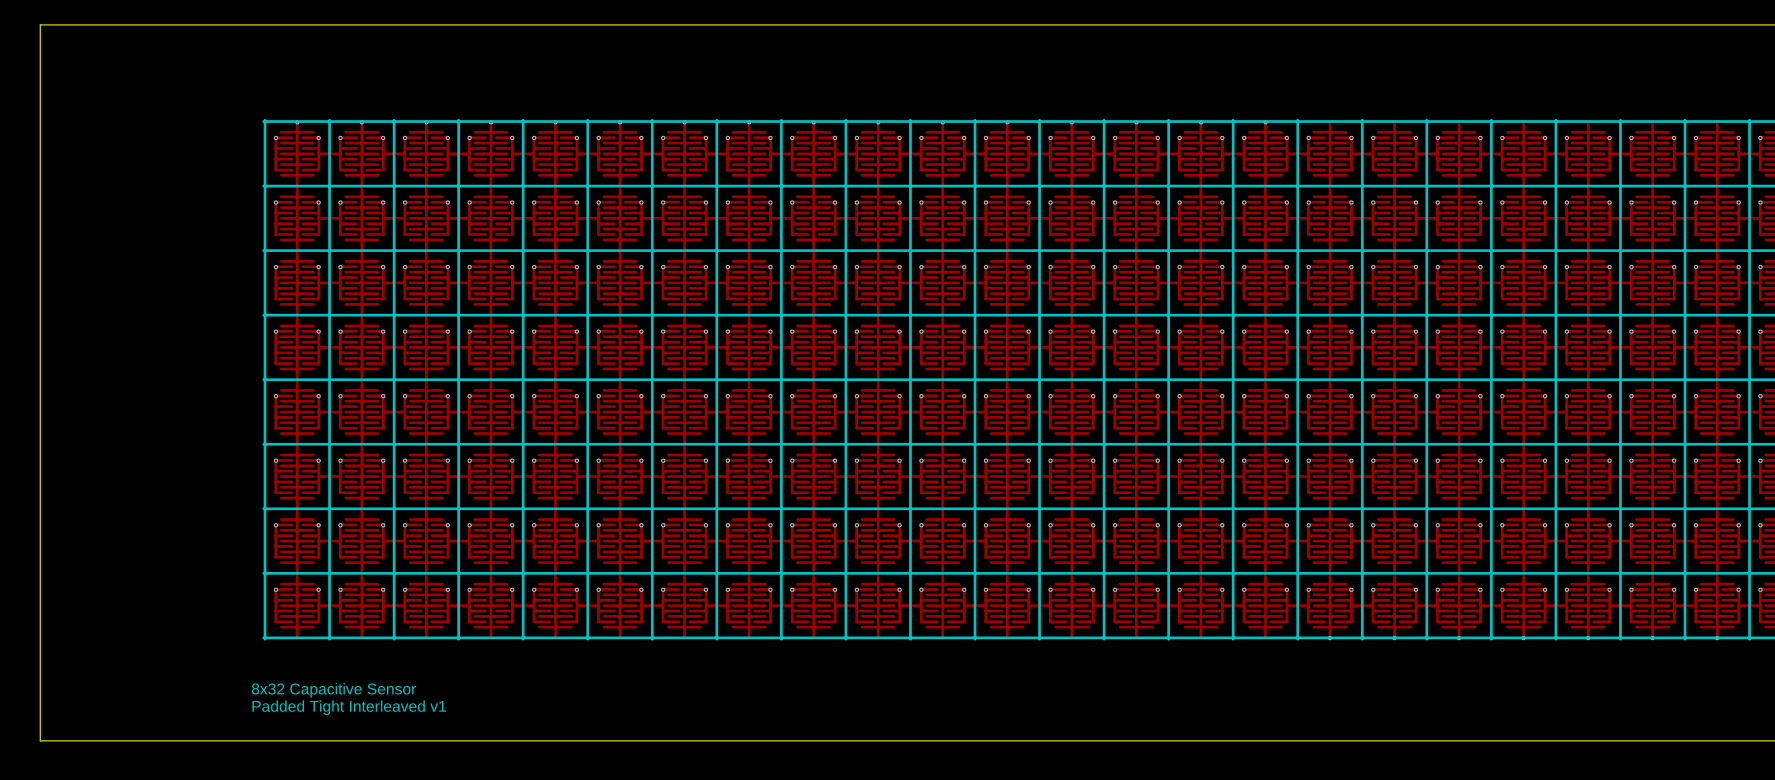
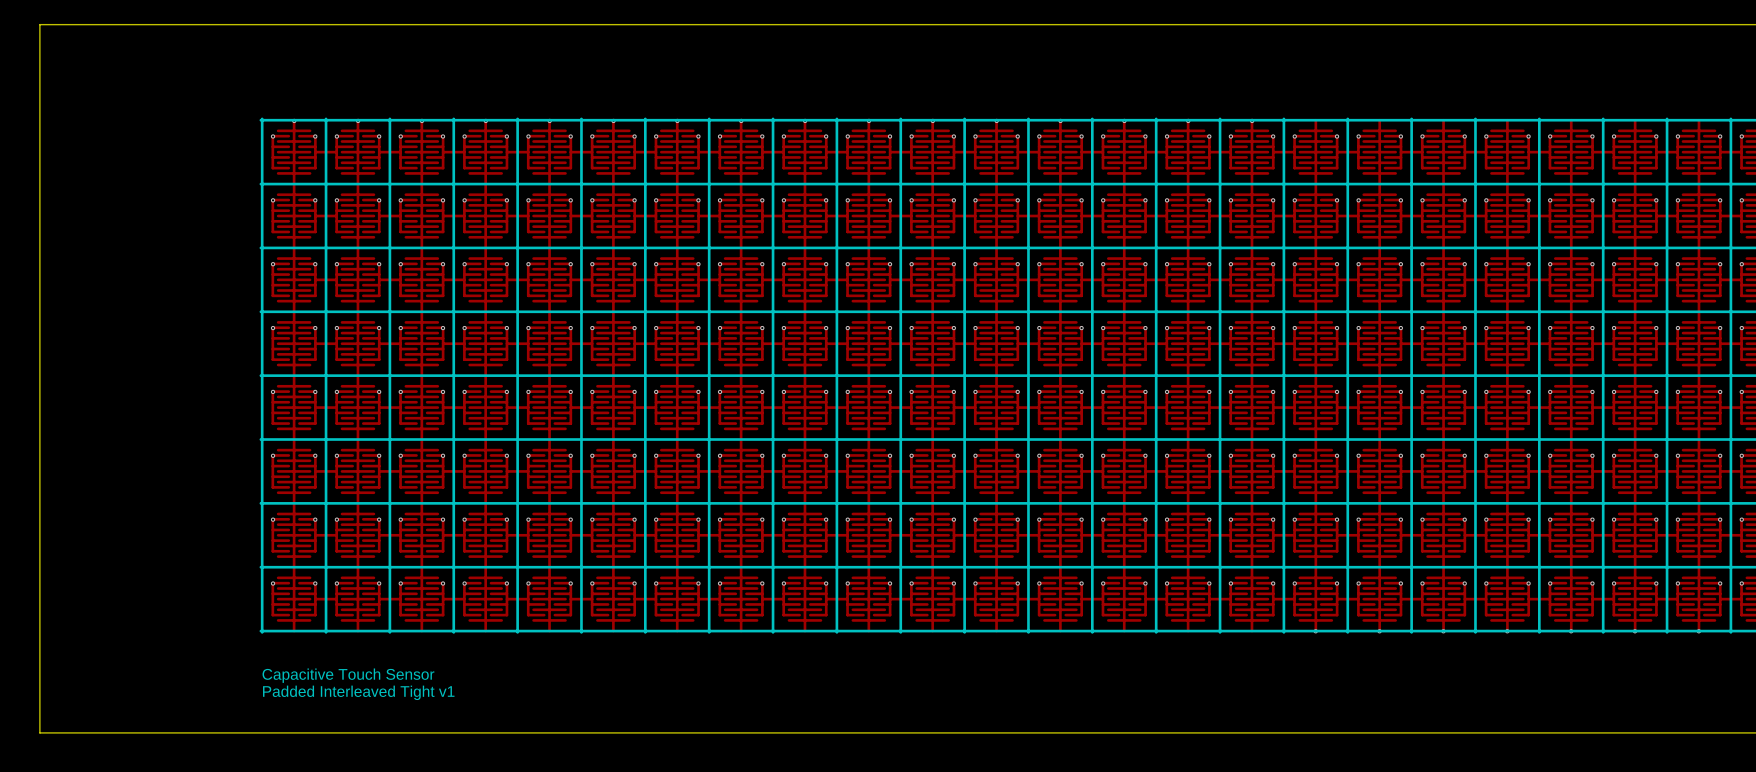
text: 8x32 Capacitive Sensor (333, 690) -> Capacitive Touch Sensor (348, 675)
text: Padded Tight Interleaved v1 (349, 707) -> Padded Interleaved Tight v1 (358, 692)

